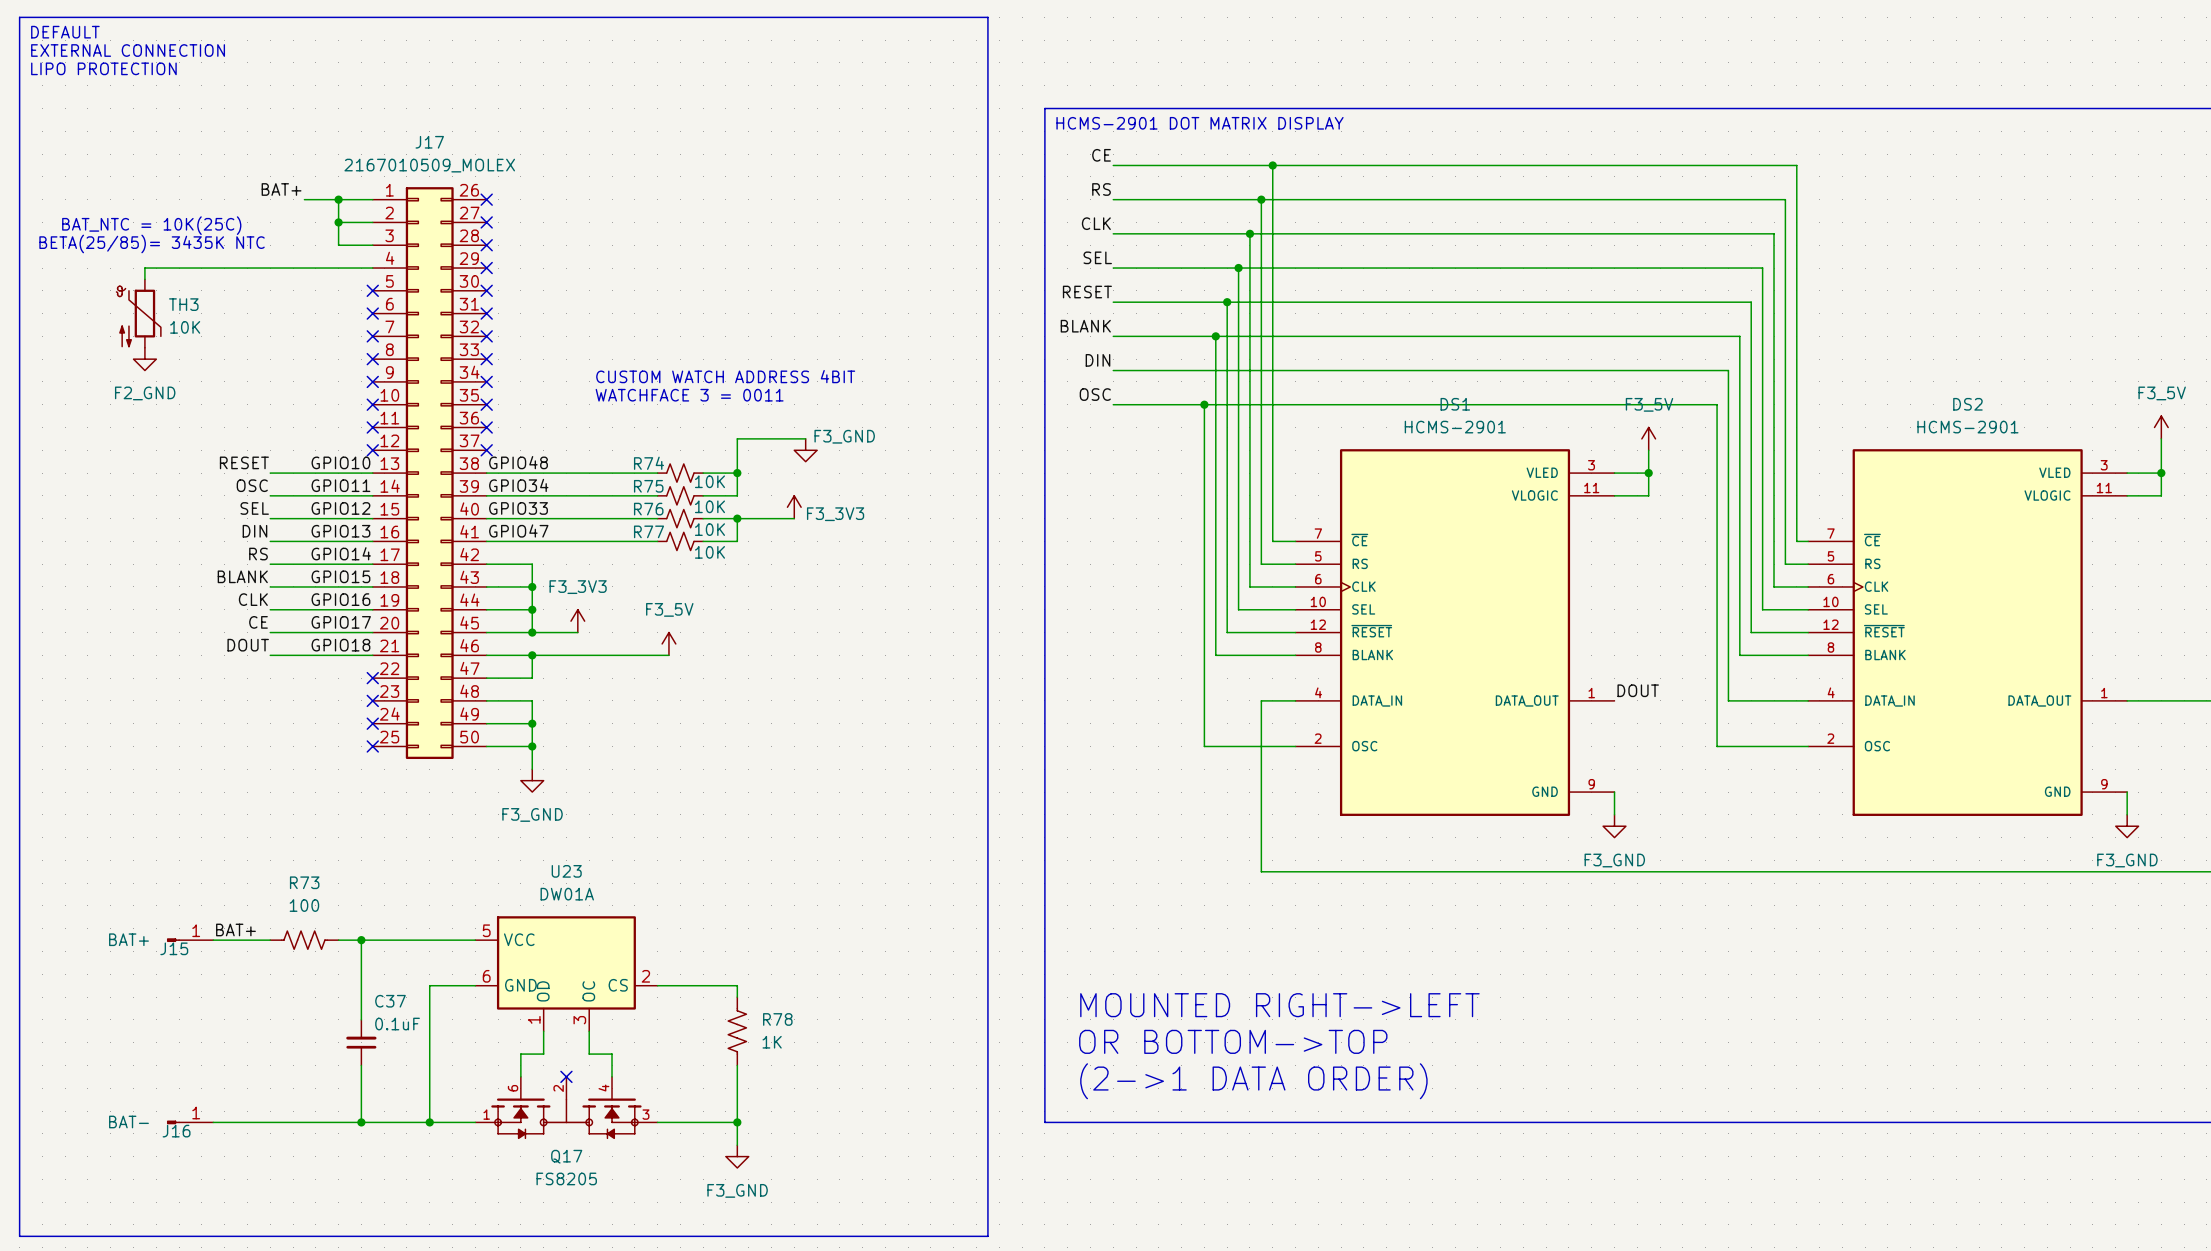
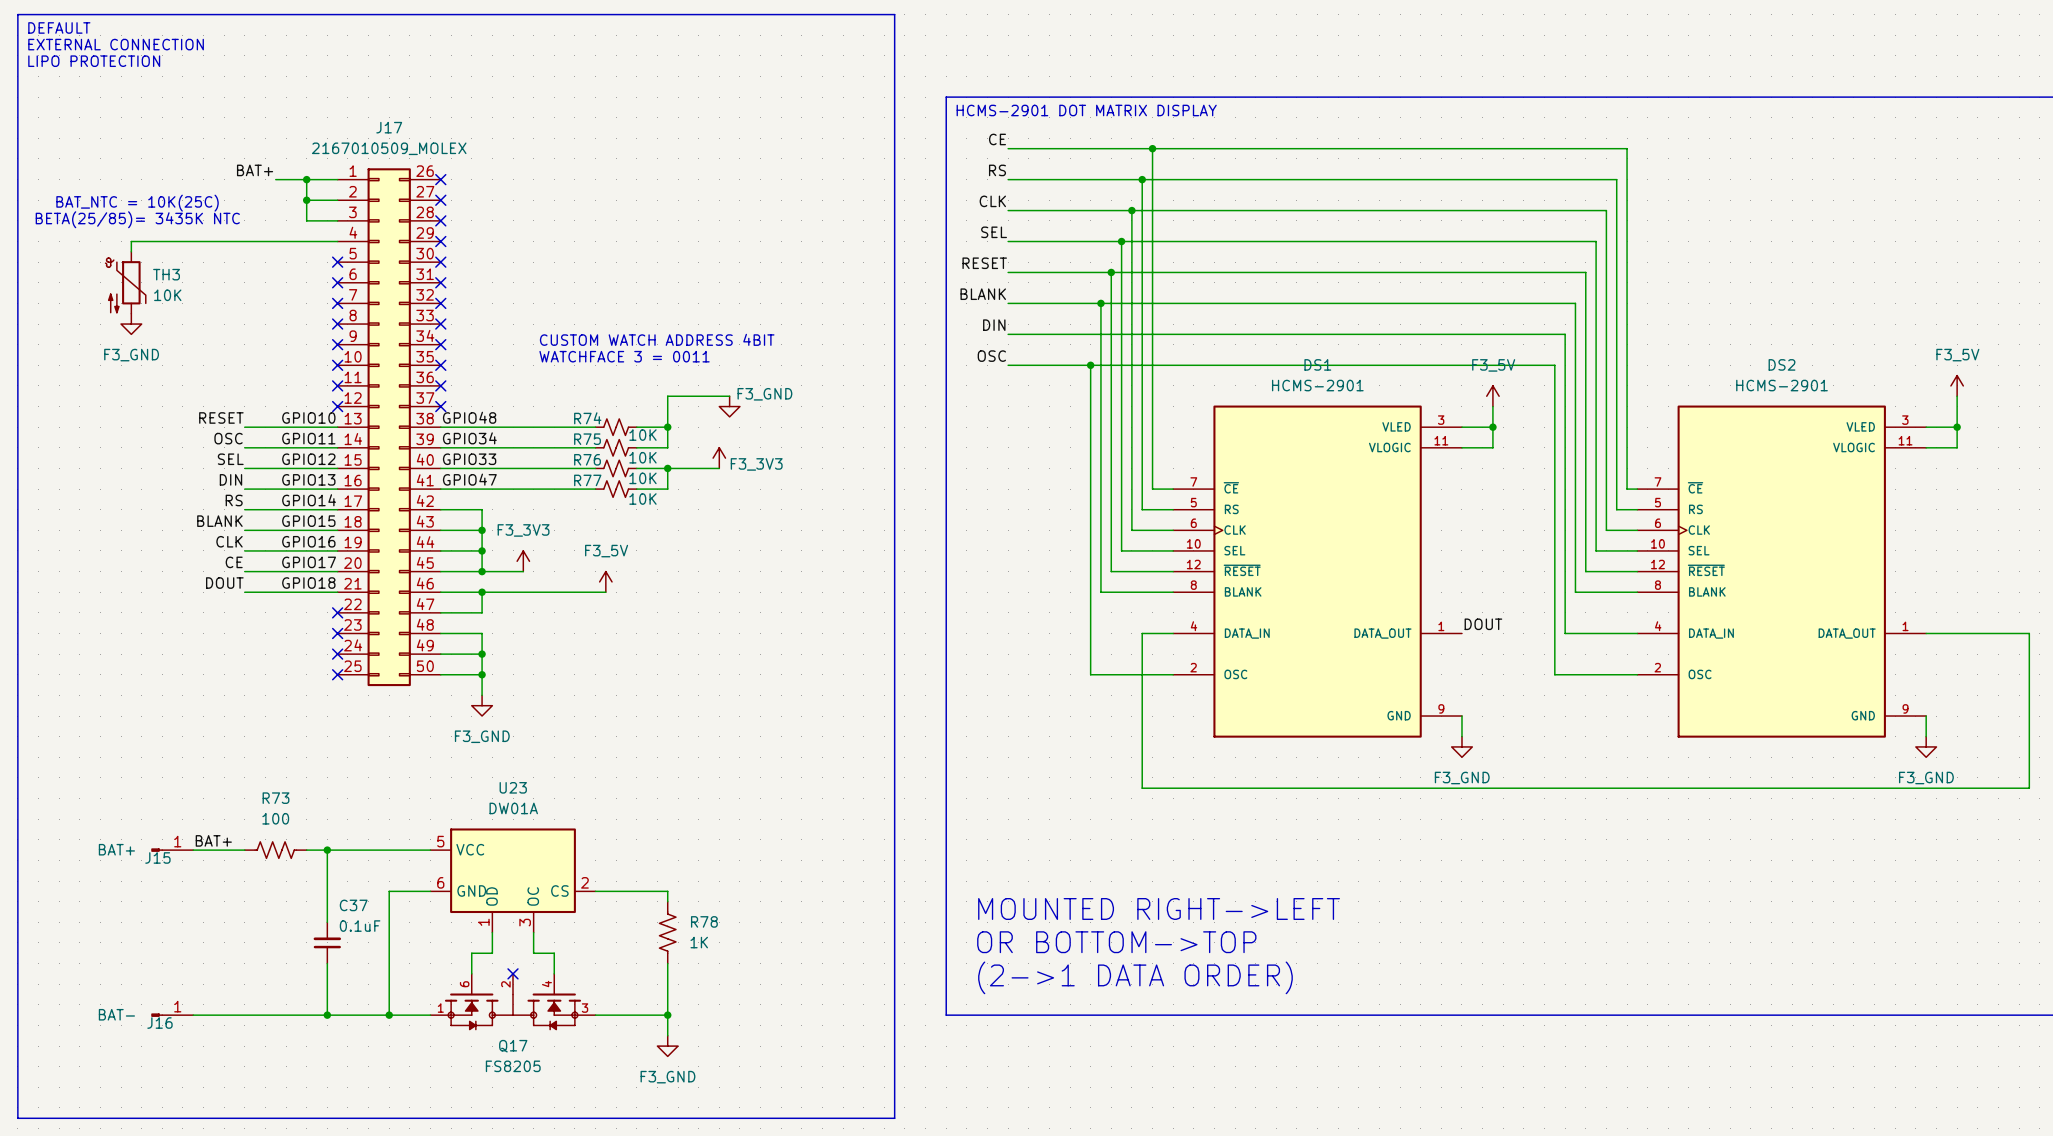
power symbol: F2_GND (144, 359) -> F3_GND (131, 324)

